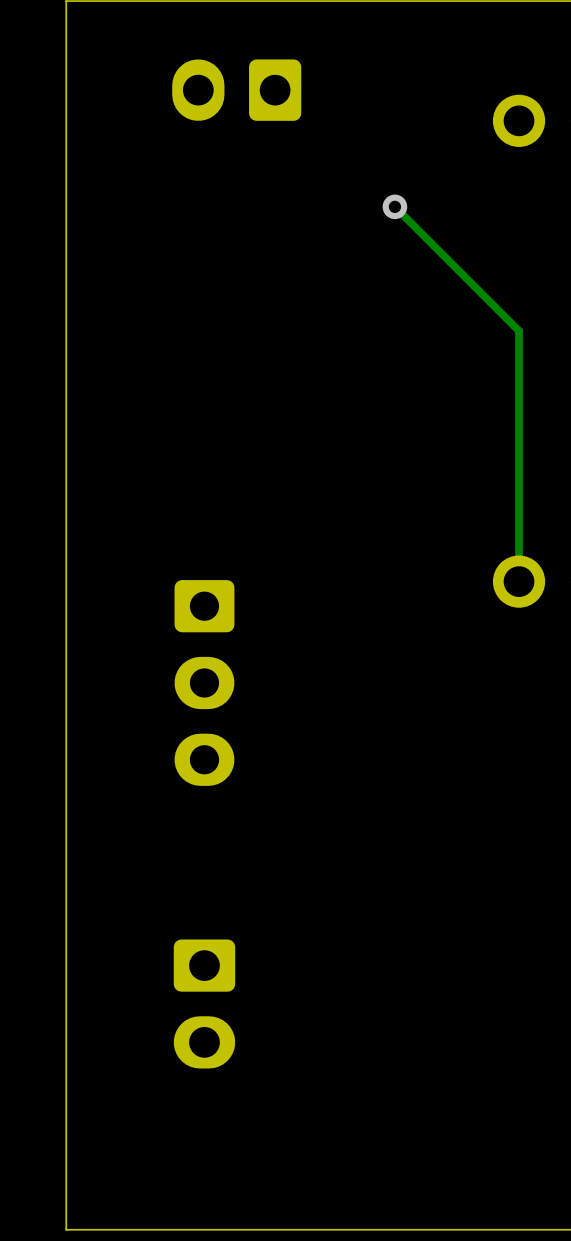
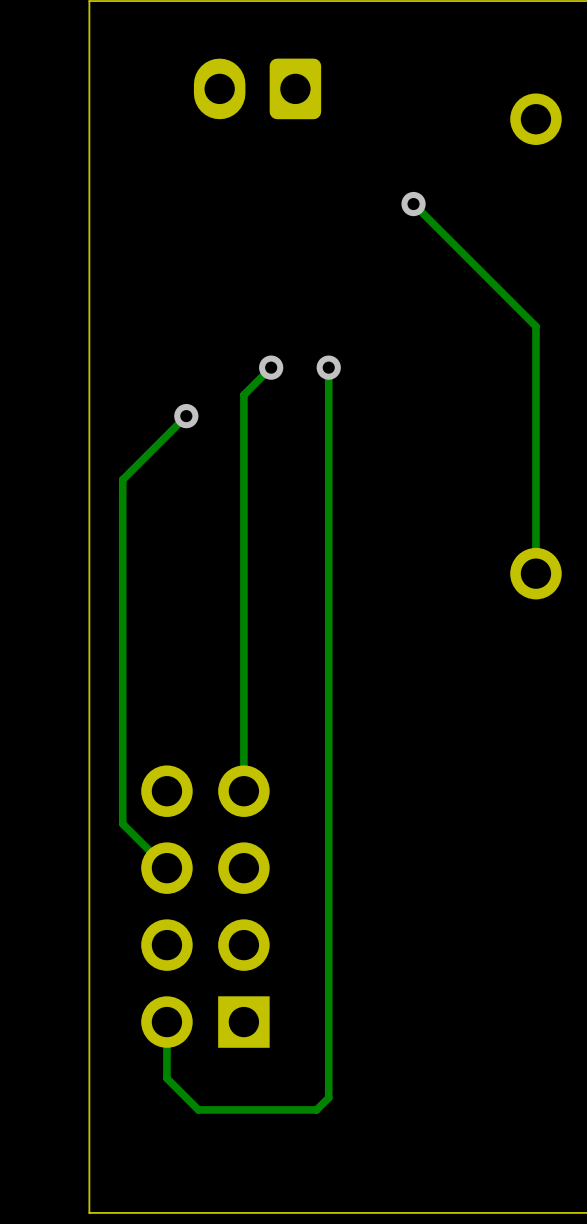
track: none -> (271, 367) (243, 394) (243, 791)
via: none -> (271, 367)
track: none -> (328, 367) (328, 1097) (316, 1109) (198, 1109) (166, 1078) (166, 1022)
via: none -> (328, 367)
track: none -> (186, 416) (122, 479) (122, 823) (166, 868)
via: none -> (186, 416)
part: (204, 682) -> none
part: none -> (205, 906)
part: (204, 1003) -> none

